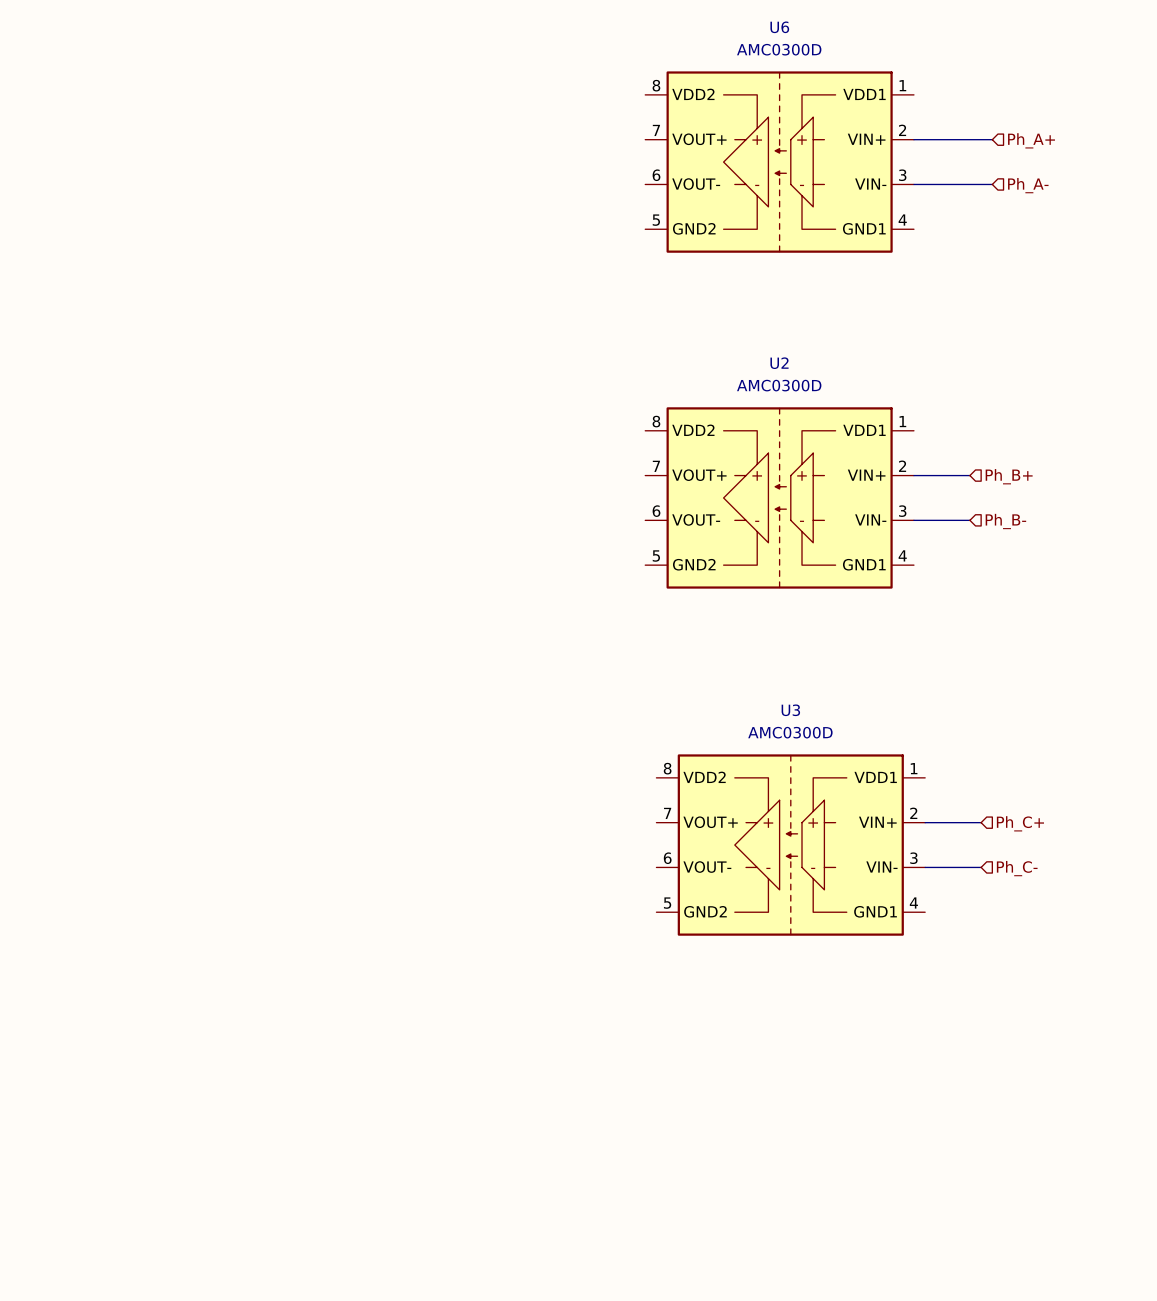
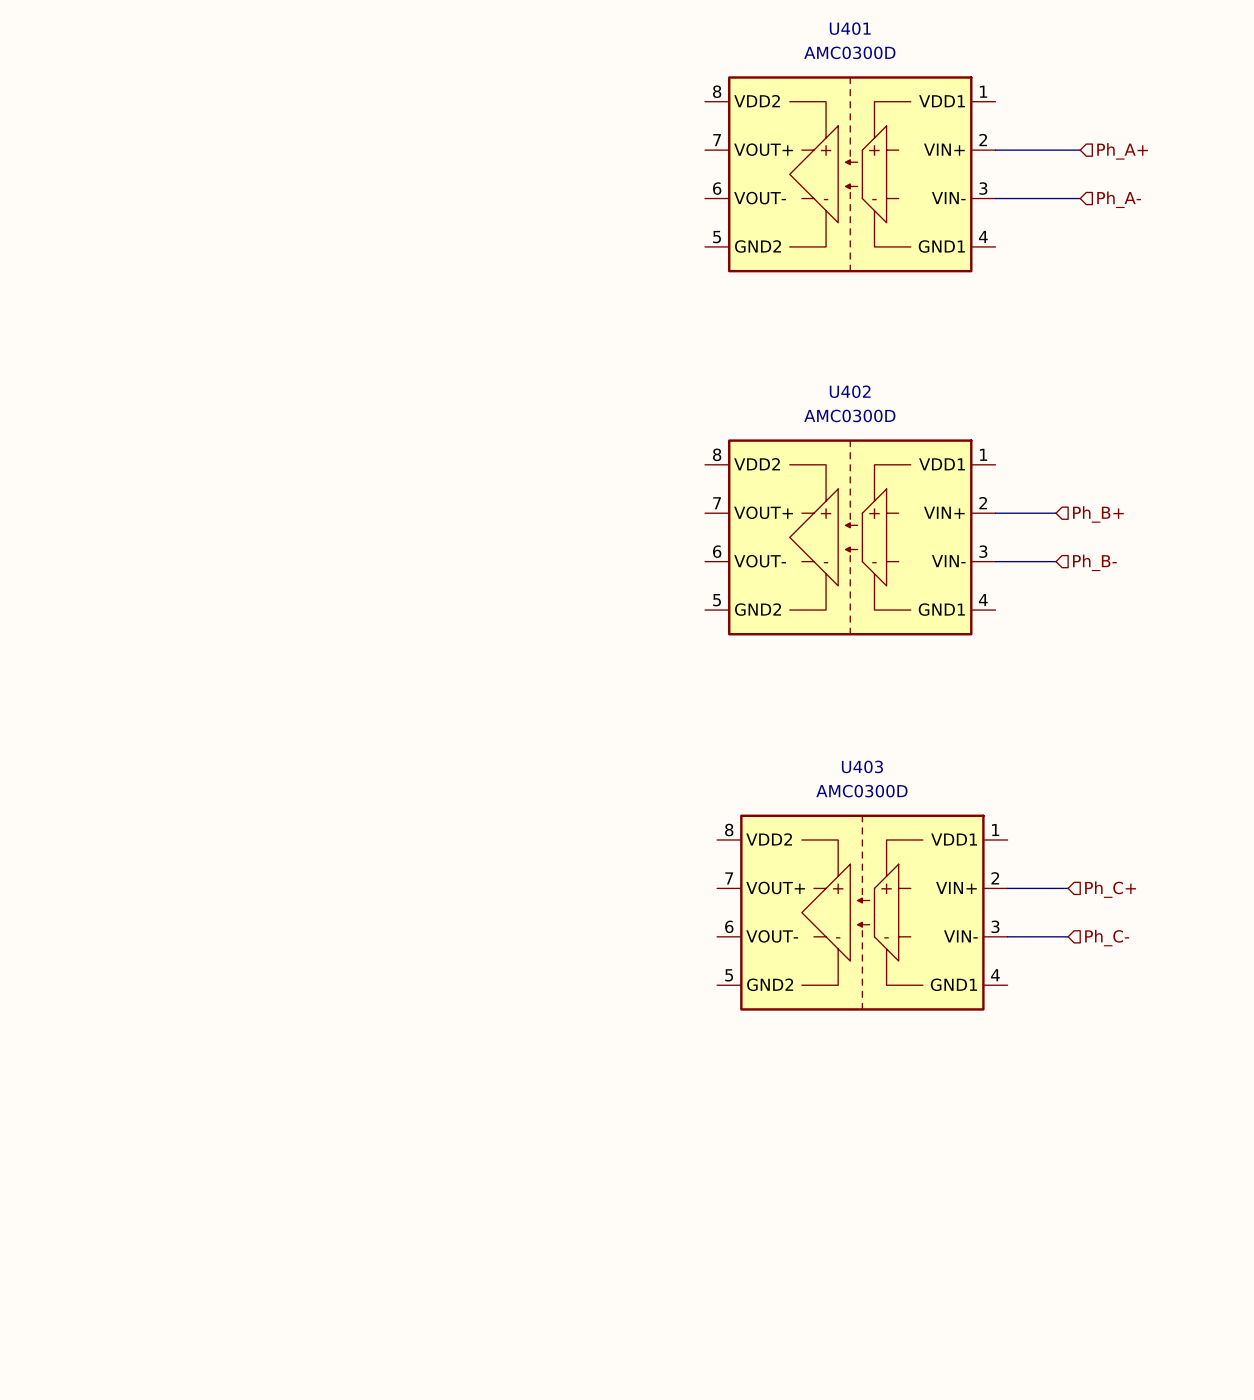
U6 name: U6 (779, 27) -> U401 (850, 28)
U2 name: U2 (779, 363) -> U402 (850, 391)
U3 name: U3 (790, 710) -> U403 (862, 766)

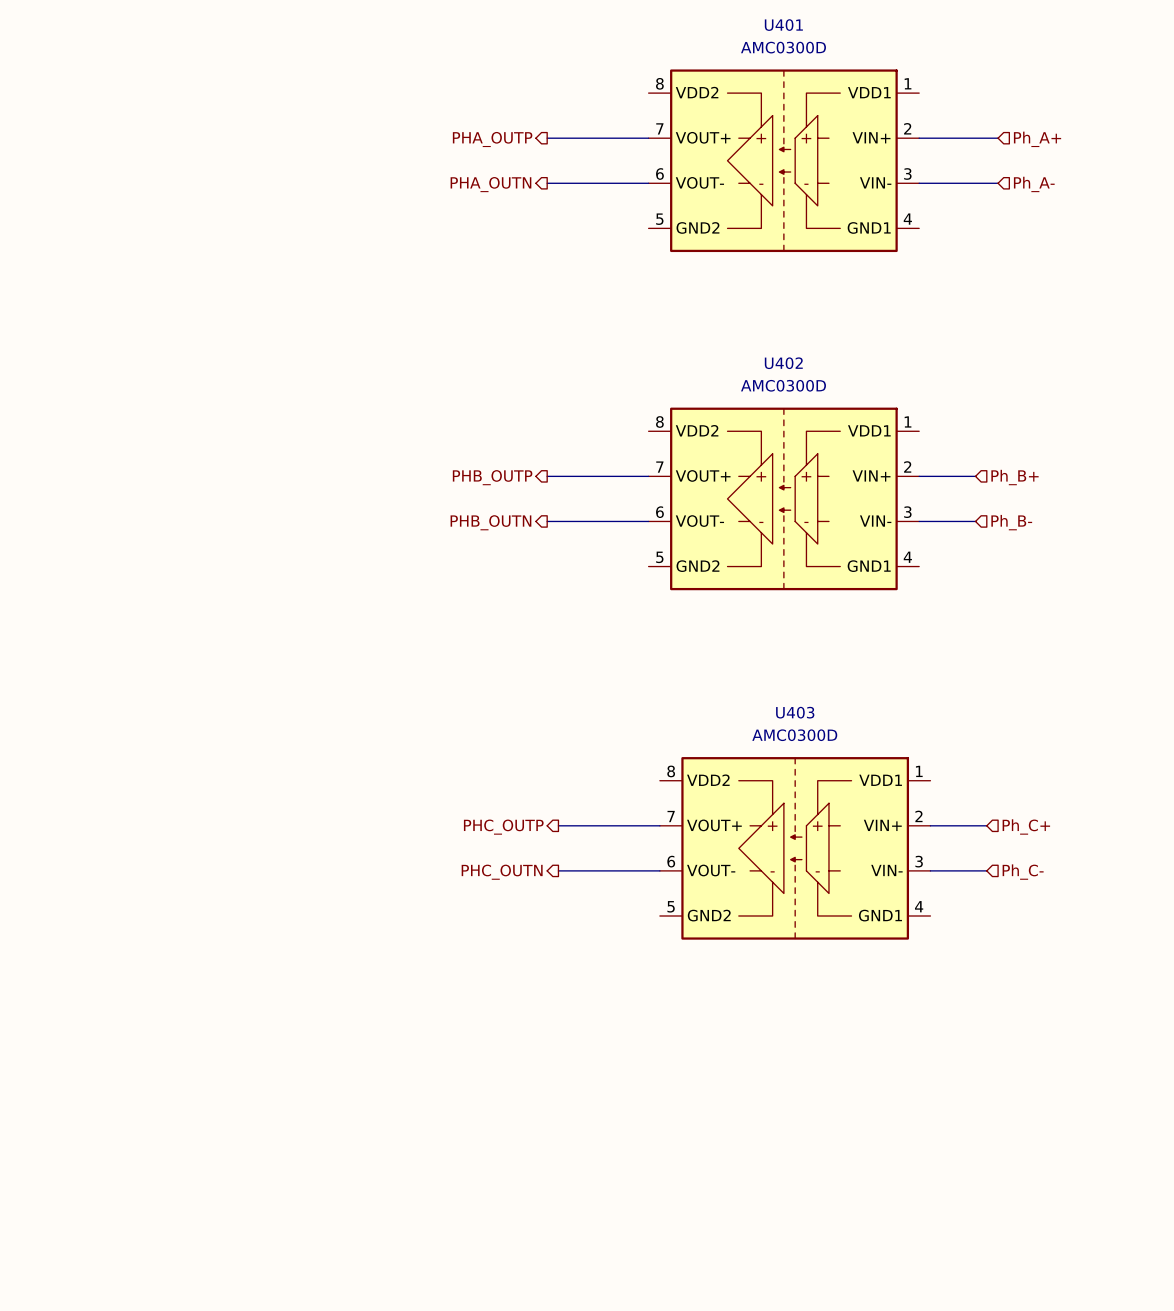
wire: none -> (547, 138) (648, 138)
hierarchical label: none -> PHA_OUTP (492, 139)
wire: none -> (547, 183) (648, 183)
hierarchical label: none -> PHA_OUTN (490, 184)
wire: none -> (547, 476) (648, 476)
hierarchical label: none -> PHB_OUTP (492, 477)
wire: none -> (547, 521) (648, 521)
hierarchical label: none -> PHB_OUTN (490, 522)
wire: none -> (558, 825) (659, 825)
hierarchical label: none -> PHC_OUTP (503, 827)
wire: none -> (558, 870) (659, 870)
hierarchical label: none -> PHC_OUTN (502, 872)

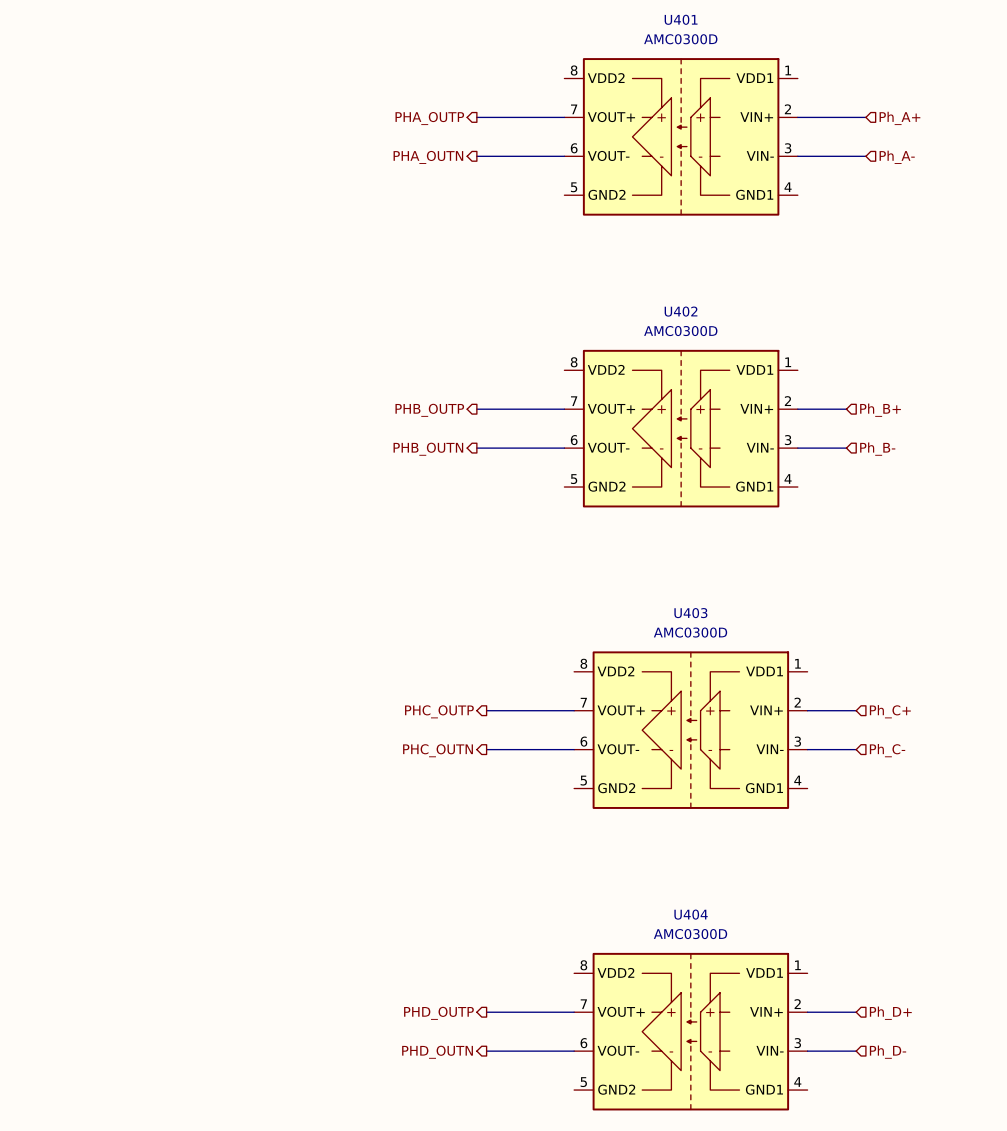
wire: none -> (486, 1012) (574, 1012)
wire: none -> (807, 1012) (856, 1012)
hierarchical label: none -> PHD_OUTP (438, 1013)
hierarchical label: none -> Ph_D+ (890, 1013)
U404: none -> AMC0300D (690, 1031)
wire: none -> (486, 1051) (574, 1051)
wire: none -> (807, 1051) (856, 1051)
hierarchical label: none -> PHD_OUTN (437, 1052)
hierarchical label: none -> Ph_D- (888, 1052)

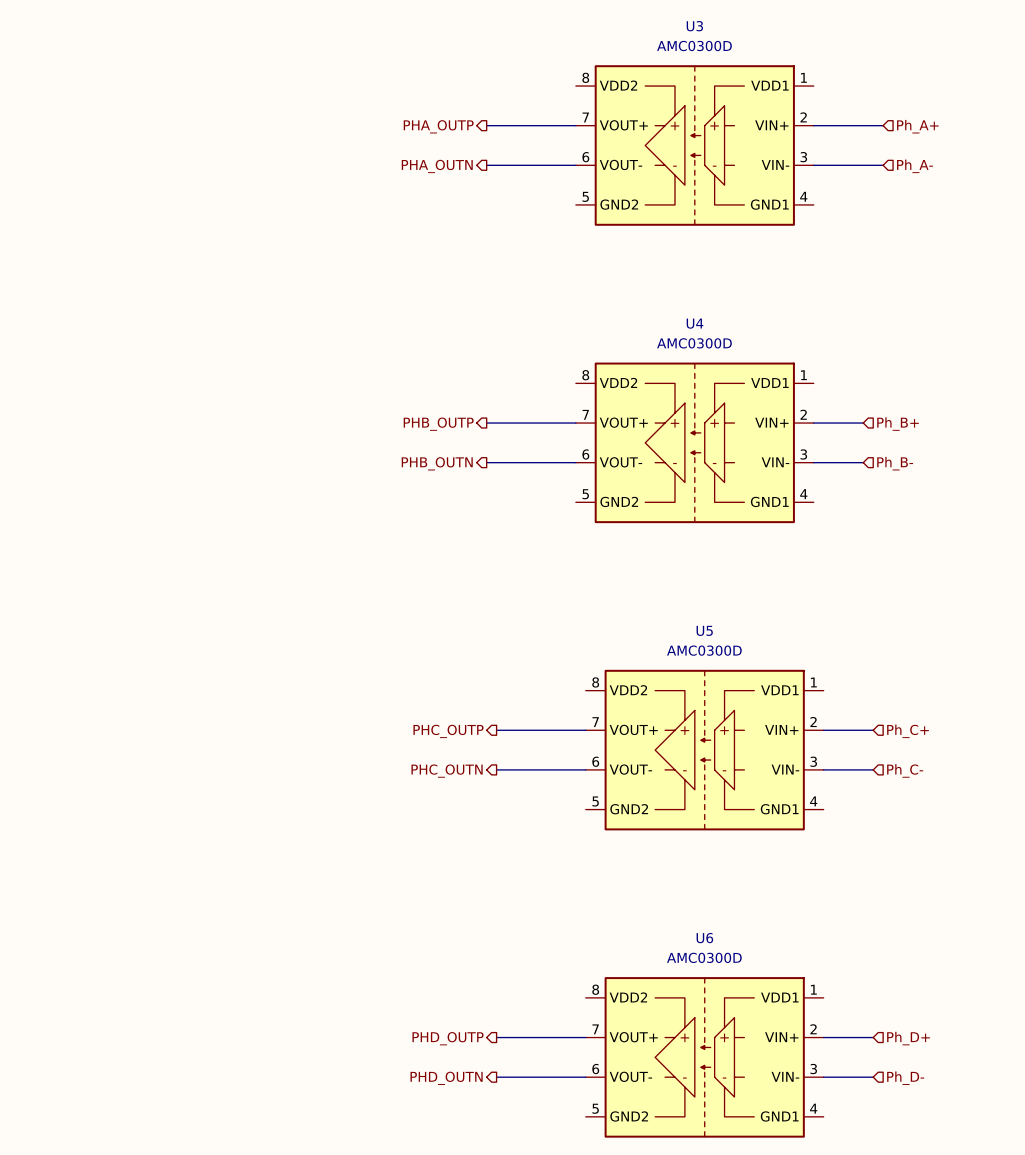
U401 name: U401 (681, 19) -> U3 (694, 26)
U402 name: U402 (681, 311) -> U4 (695, 323)
U403 name: U403 (690, 613) -> U5 (704, 630)
U404 name: U404 (691, 914) -> U6 (704, 938)

